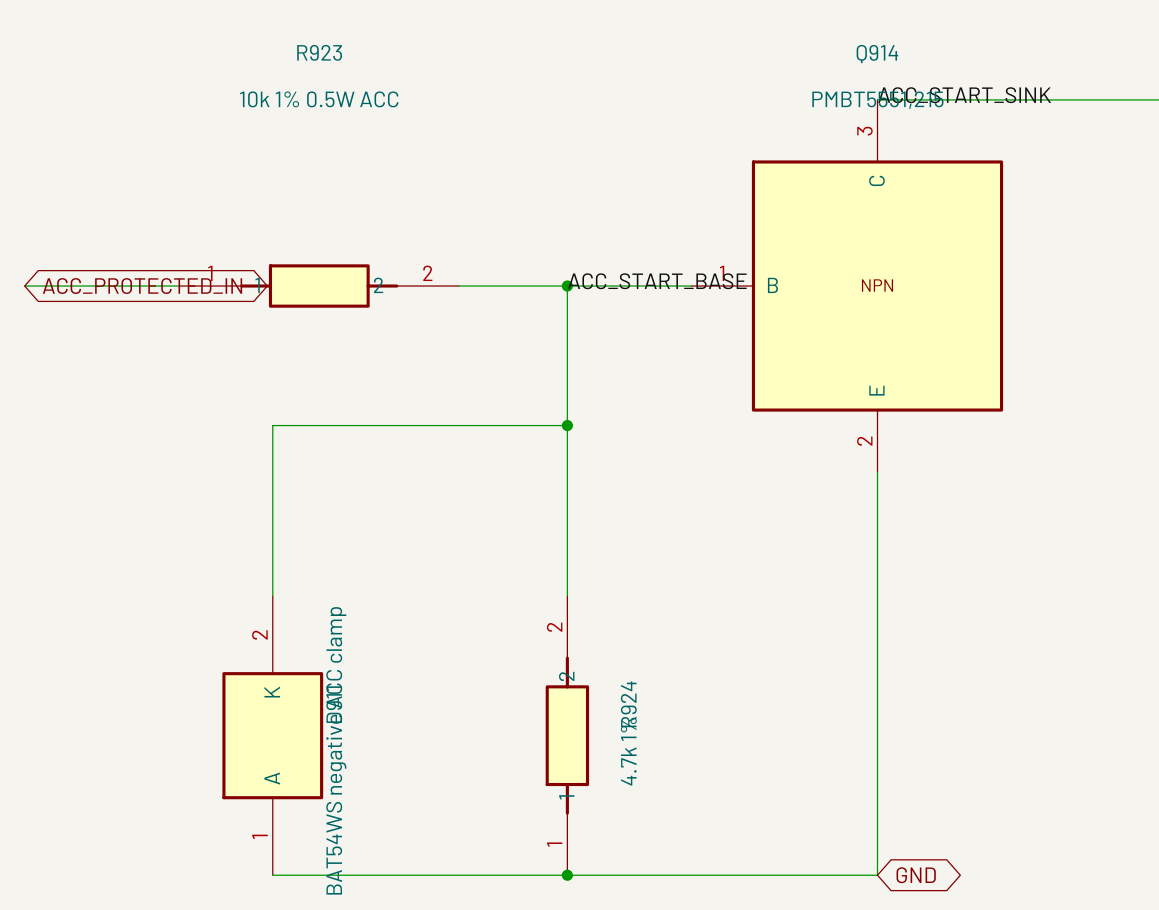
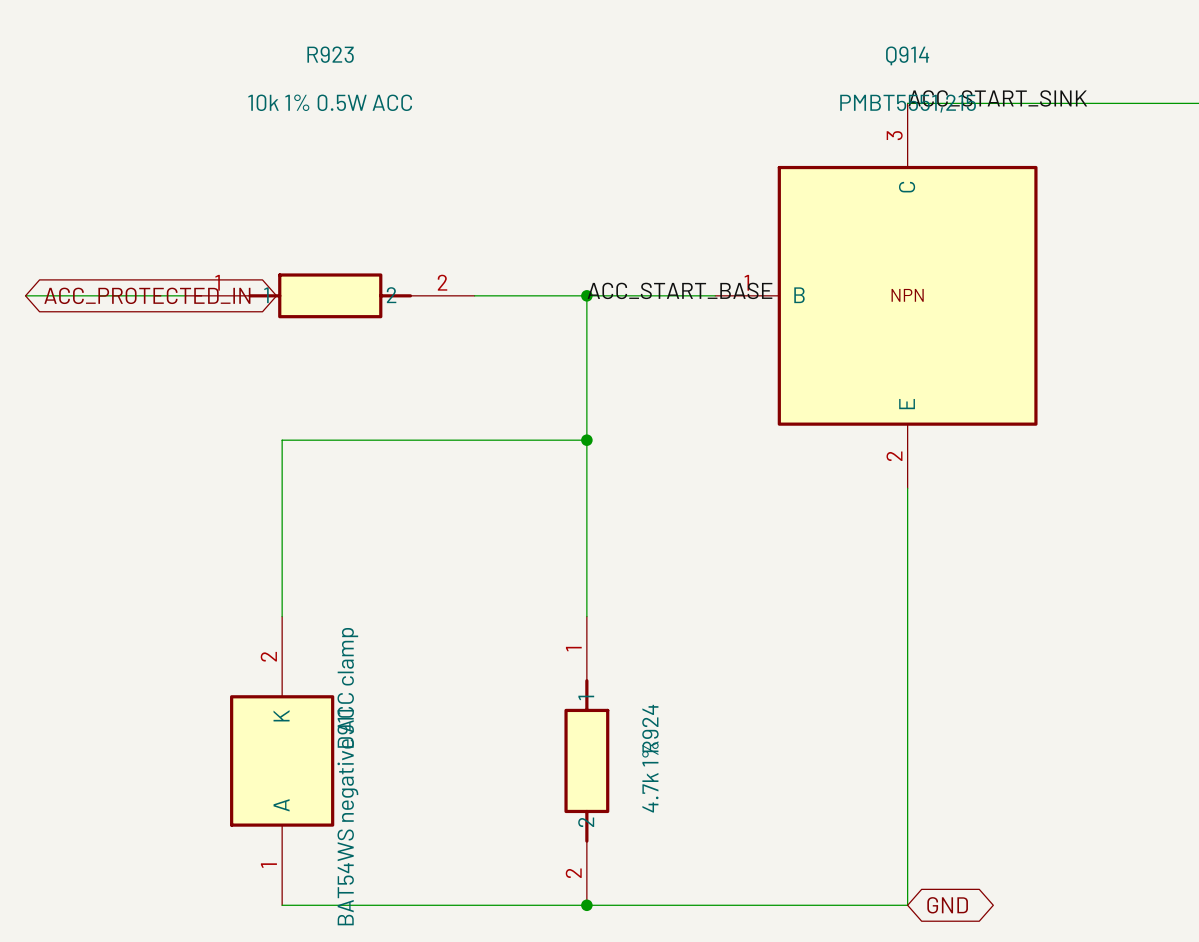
R924 rotation: 0° (567, 735) -> 180° (586, 760)

